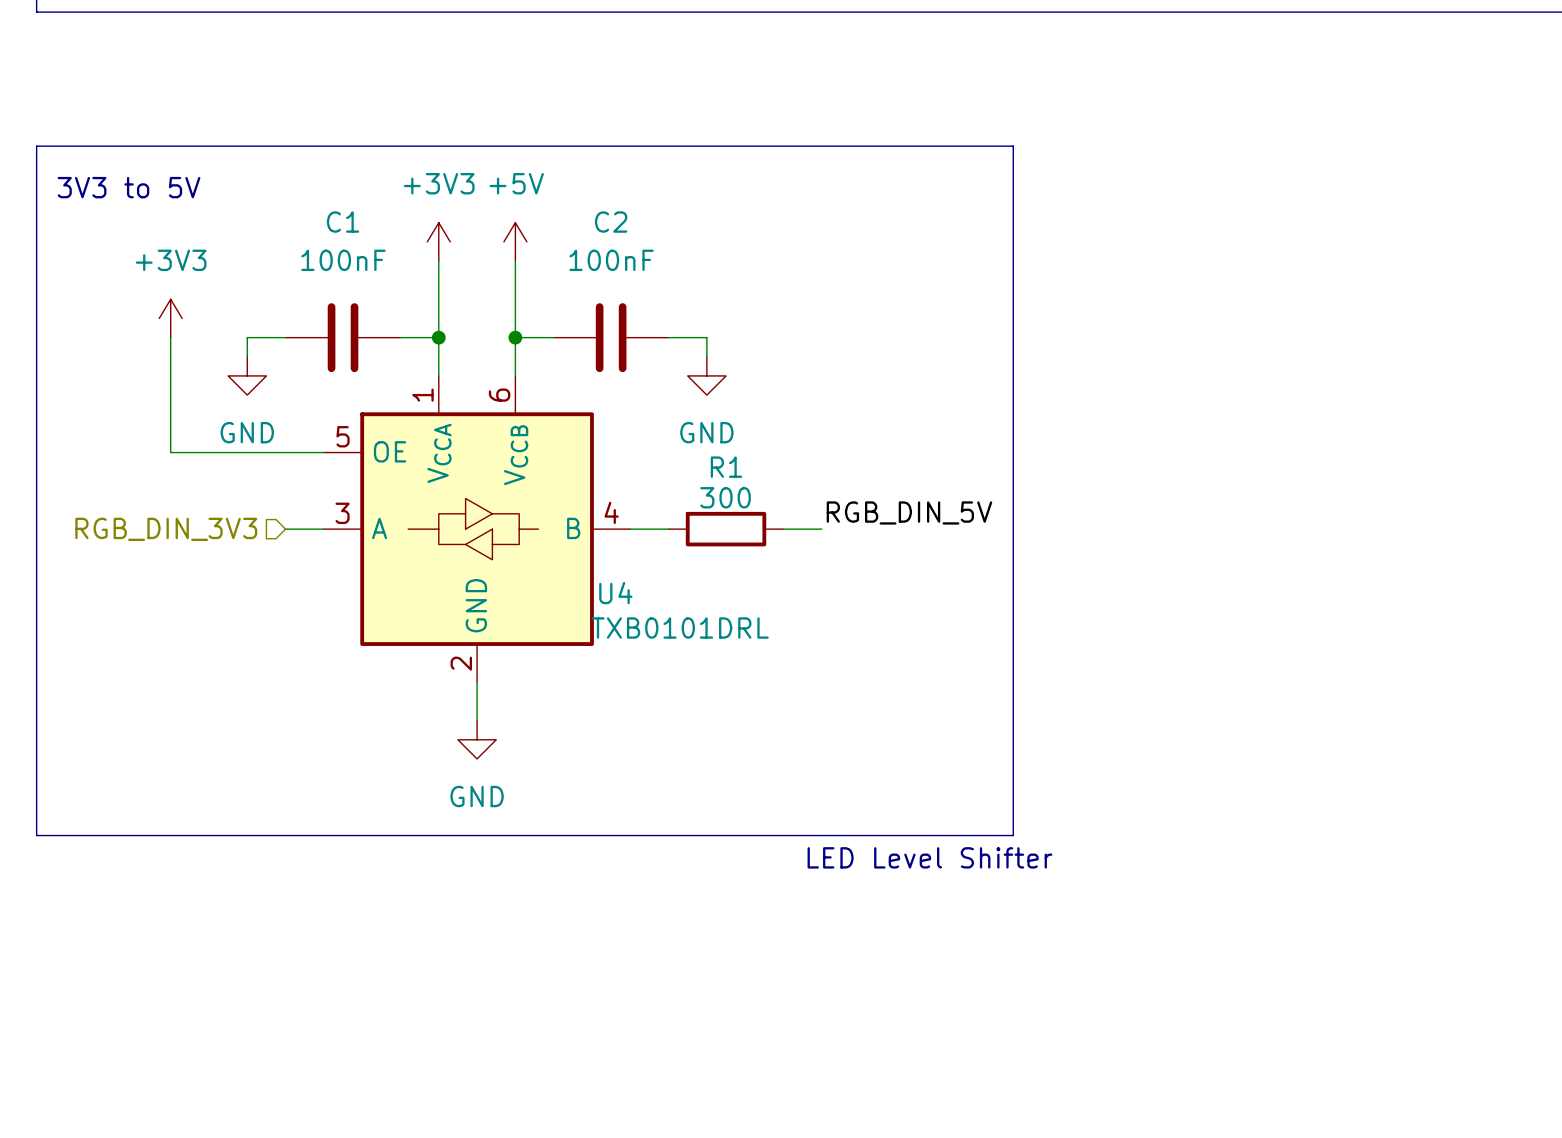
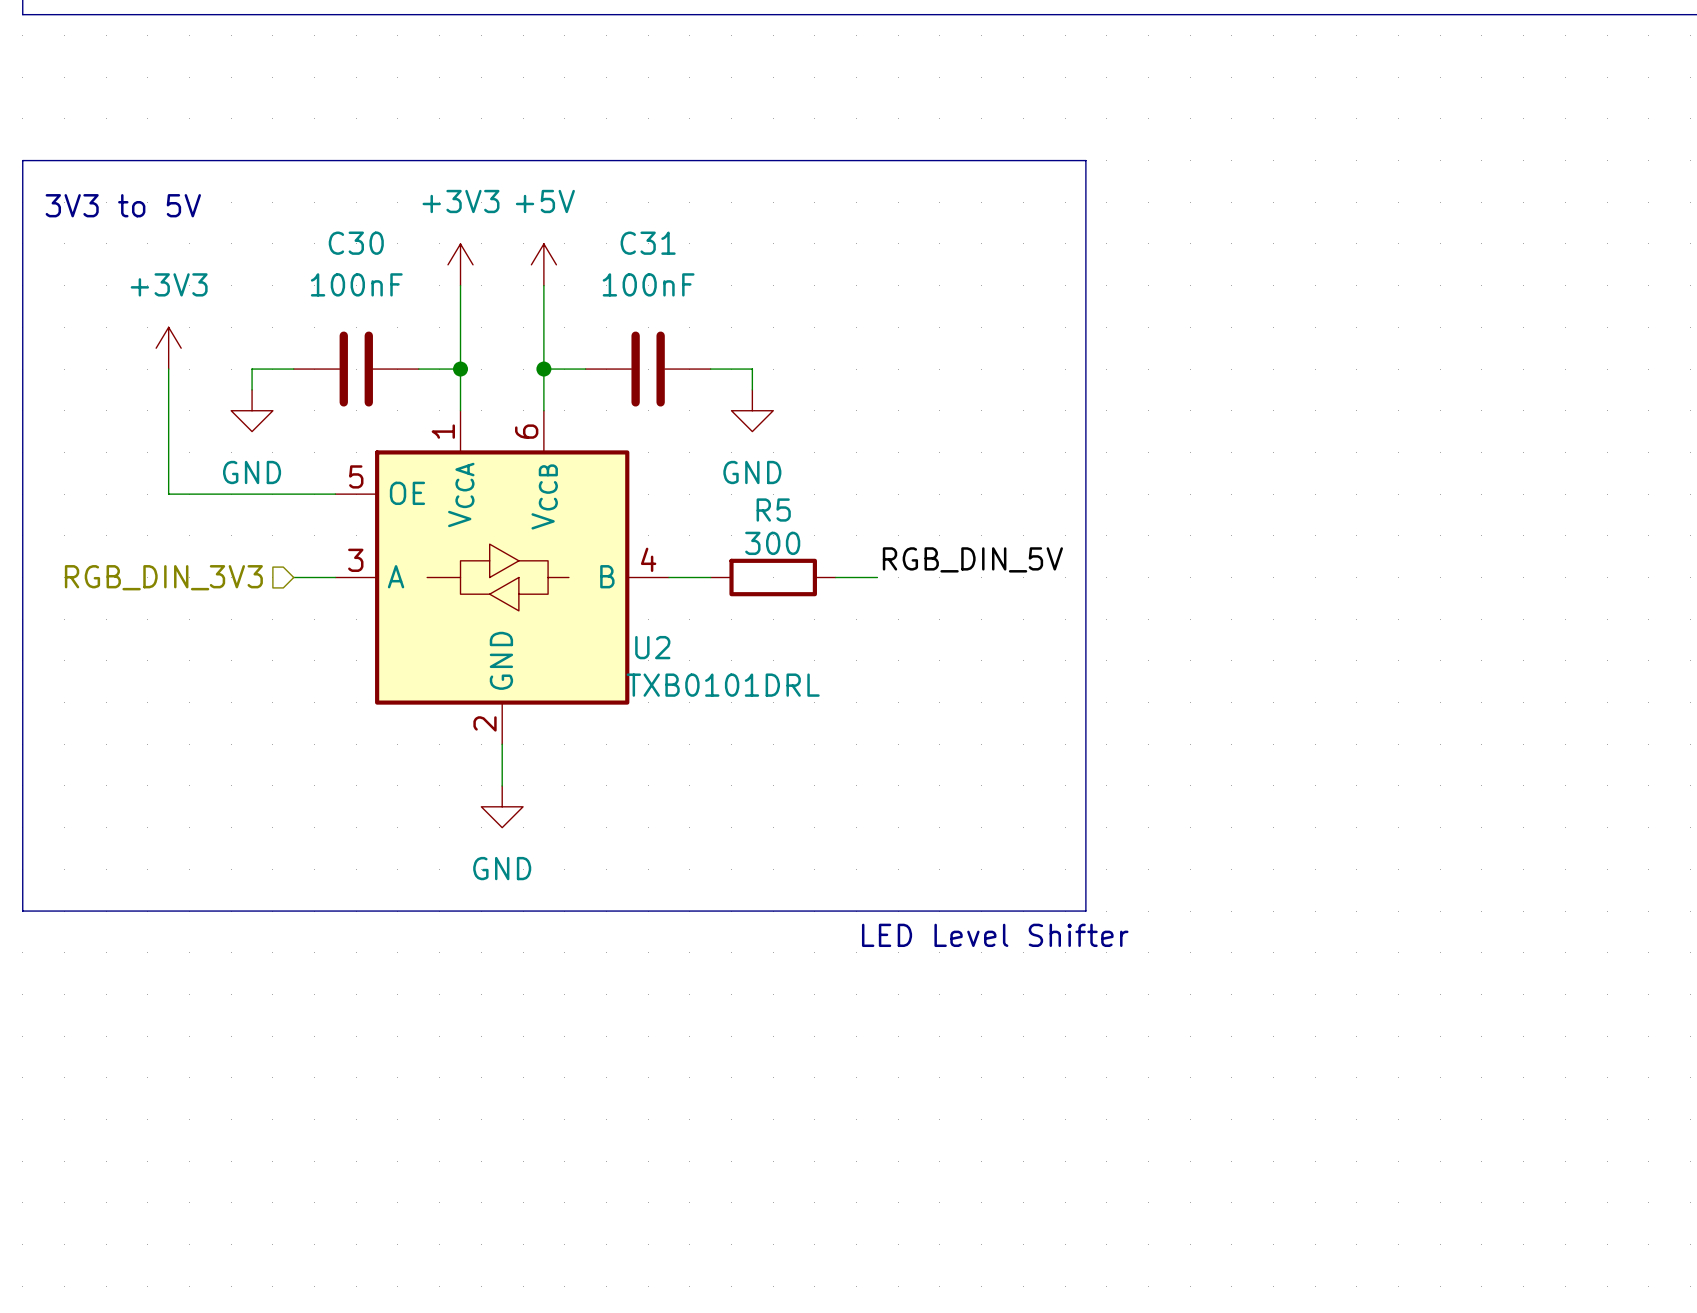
C1 name: C1 (343, 222) -> C30 (356, 243)
C2 name: C2 (611, 222) -> C31 (648, 243)
R1 name: R1 (726, 467) -> R5 (773, 510)
U4 name: U4 (615, 593) -> U2 (652, 647)

